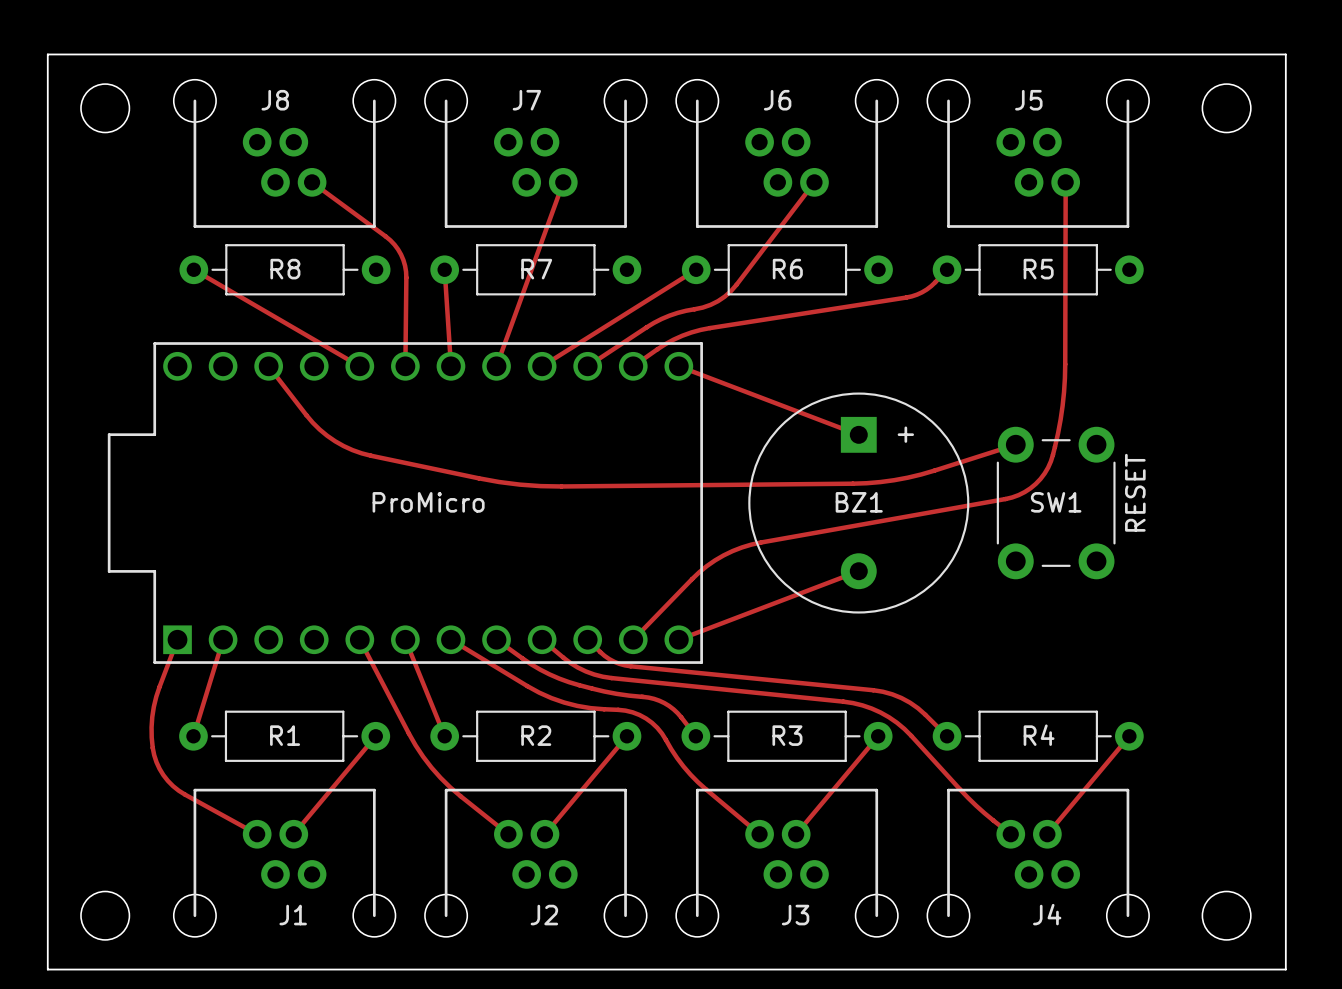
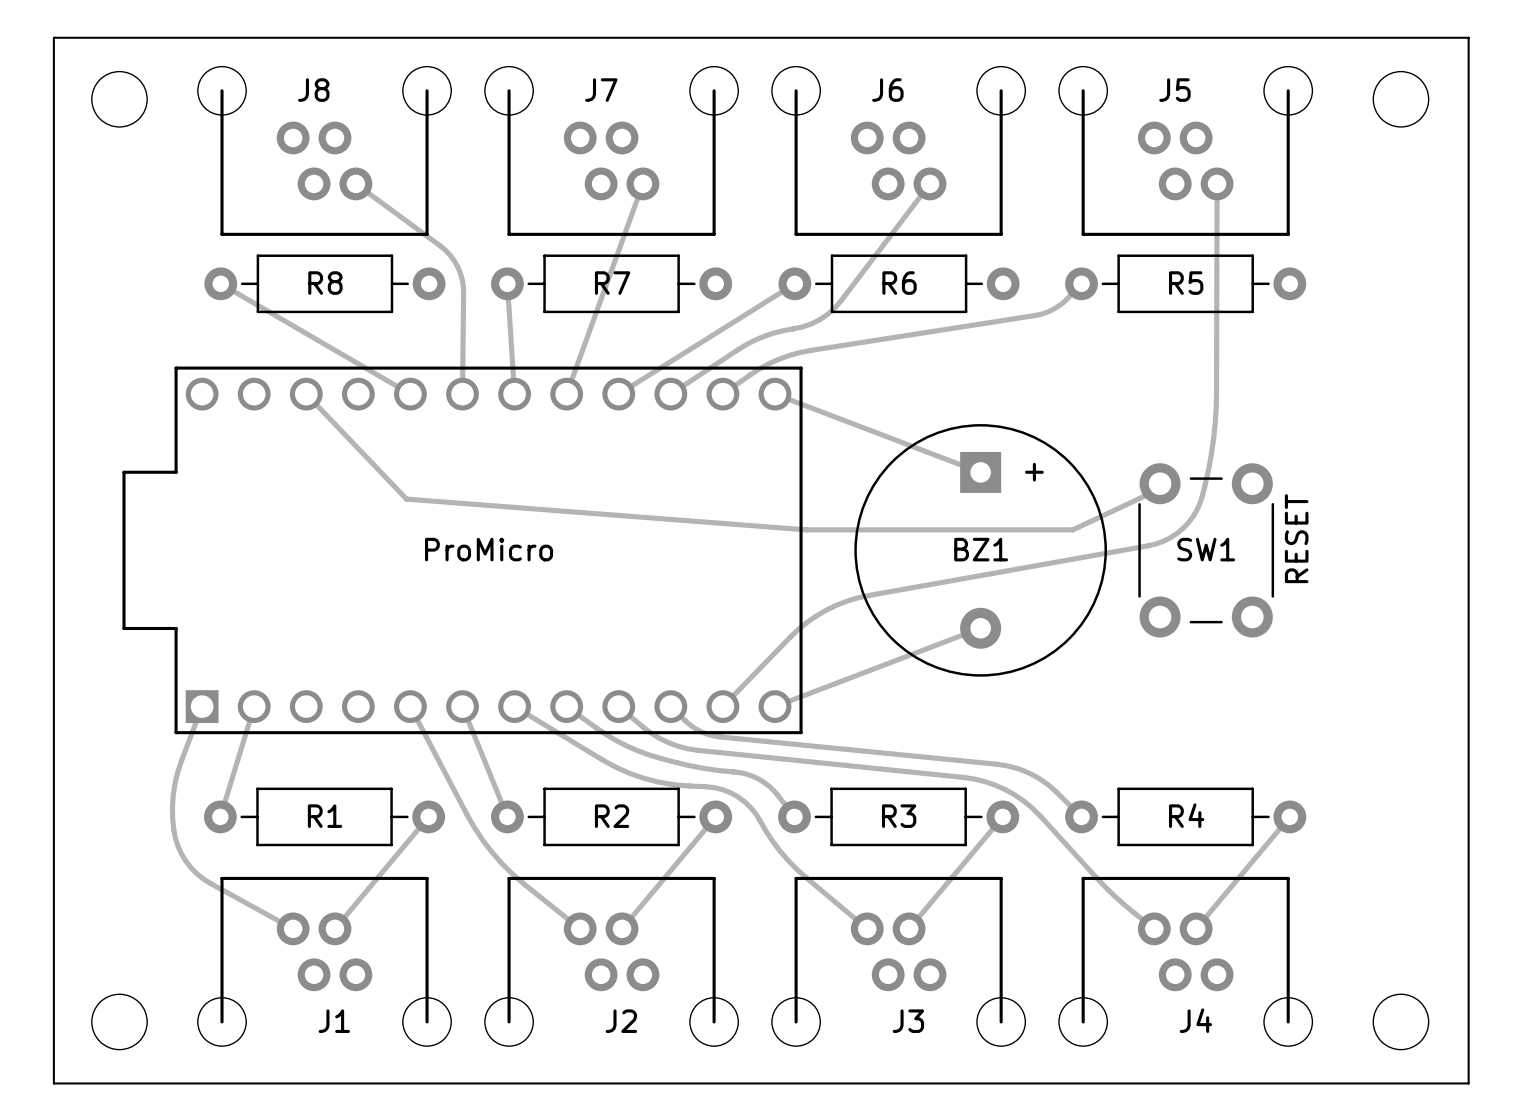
track: (268, 366) (312, 422) (327, 435) (343, 446) (371, 455) (478, 478) (519, 484) (561, 486) (866, 483) (921, 474) (1015, 444) -> (306, 394) (406, 499) (806, 529) (1072, 529) (1160, 488)

